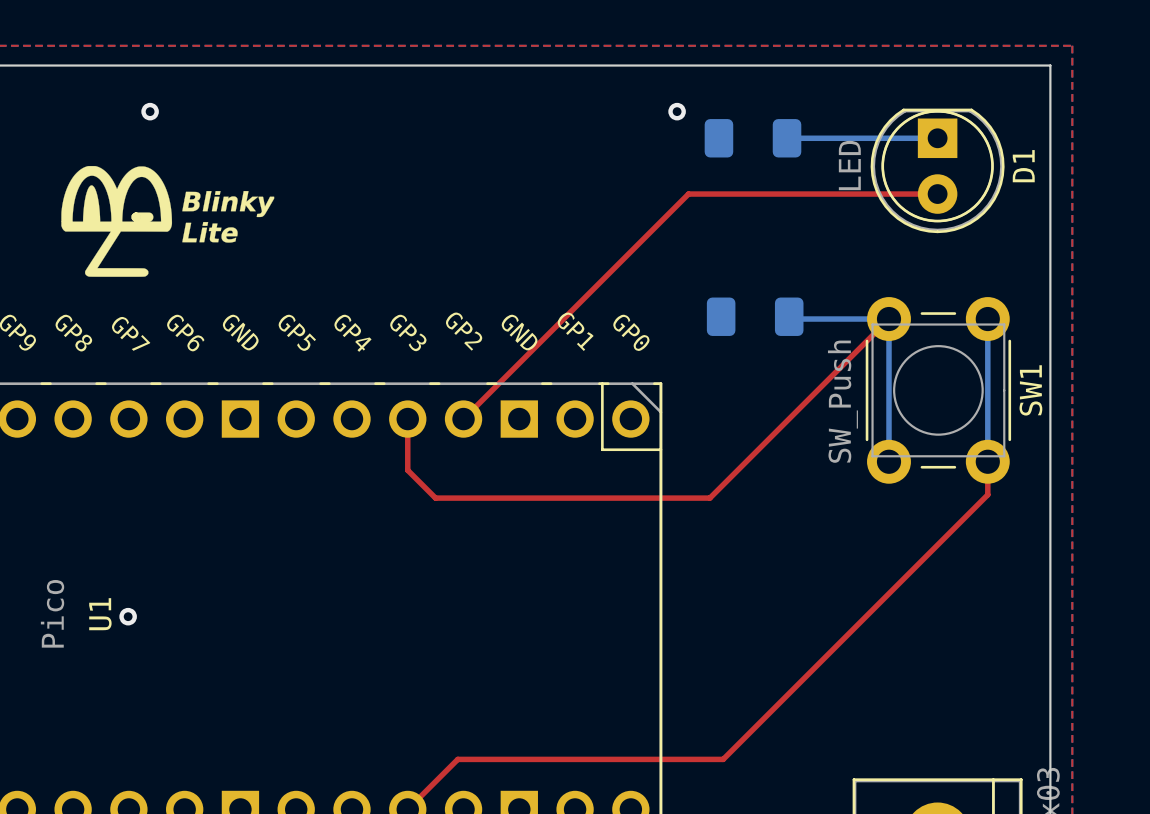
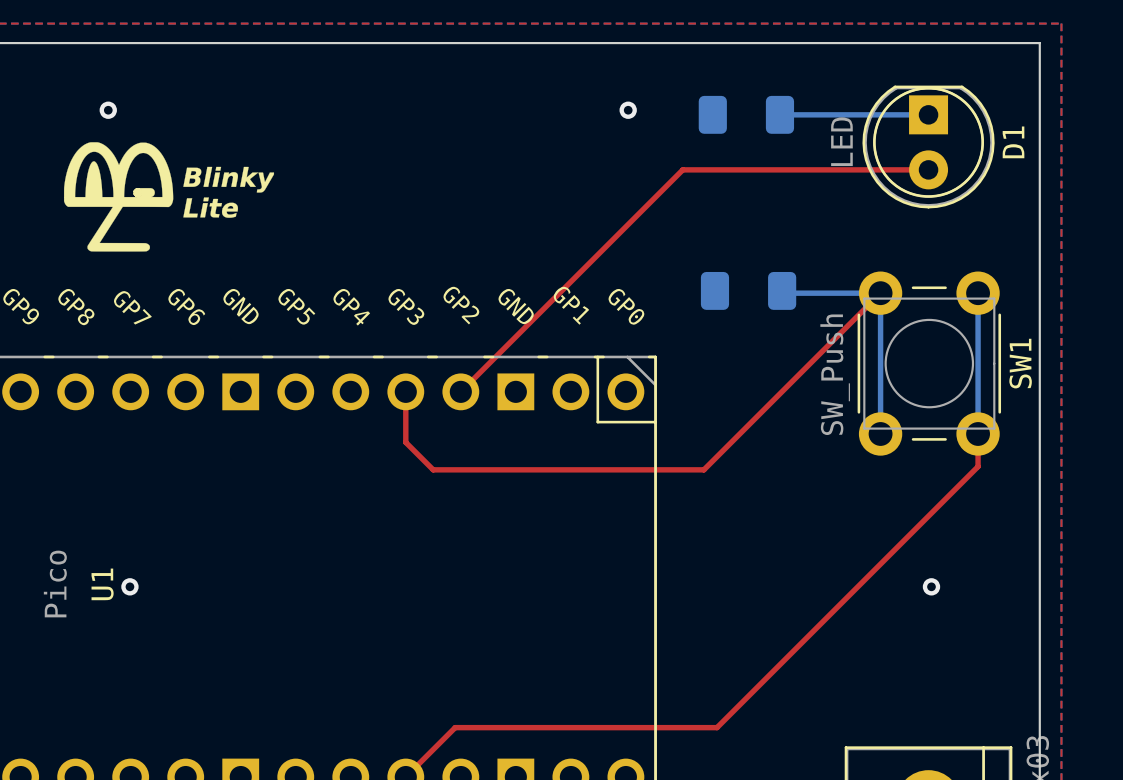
via position: (150, 111) -> (108, 110)
via position: (677, 111) -> (628, 110)
via: none -> (931, 586)

